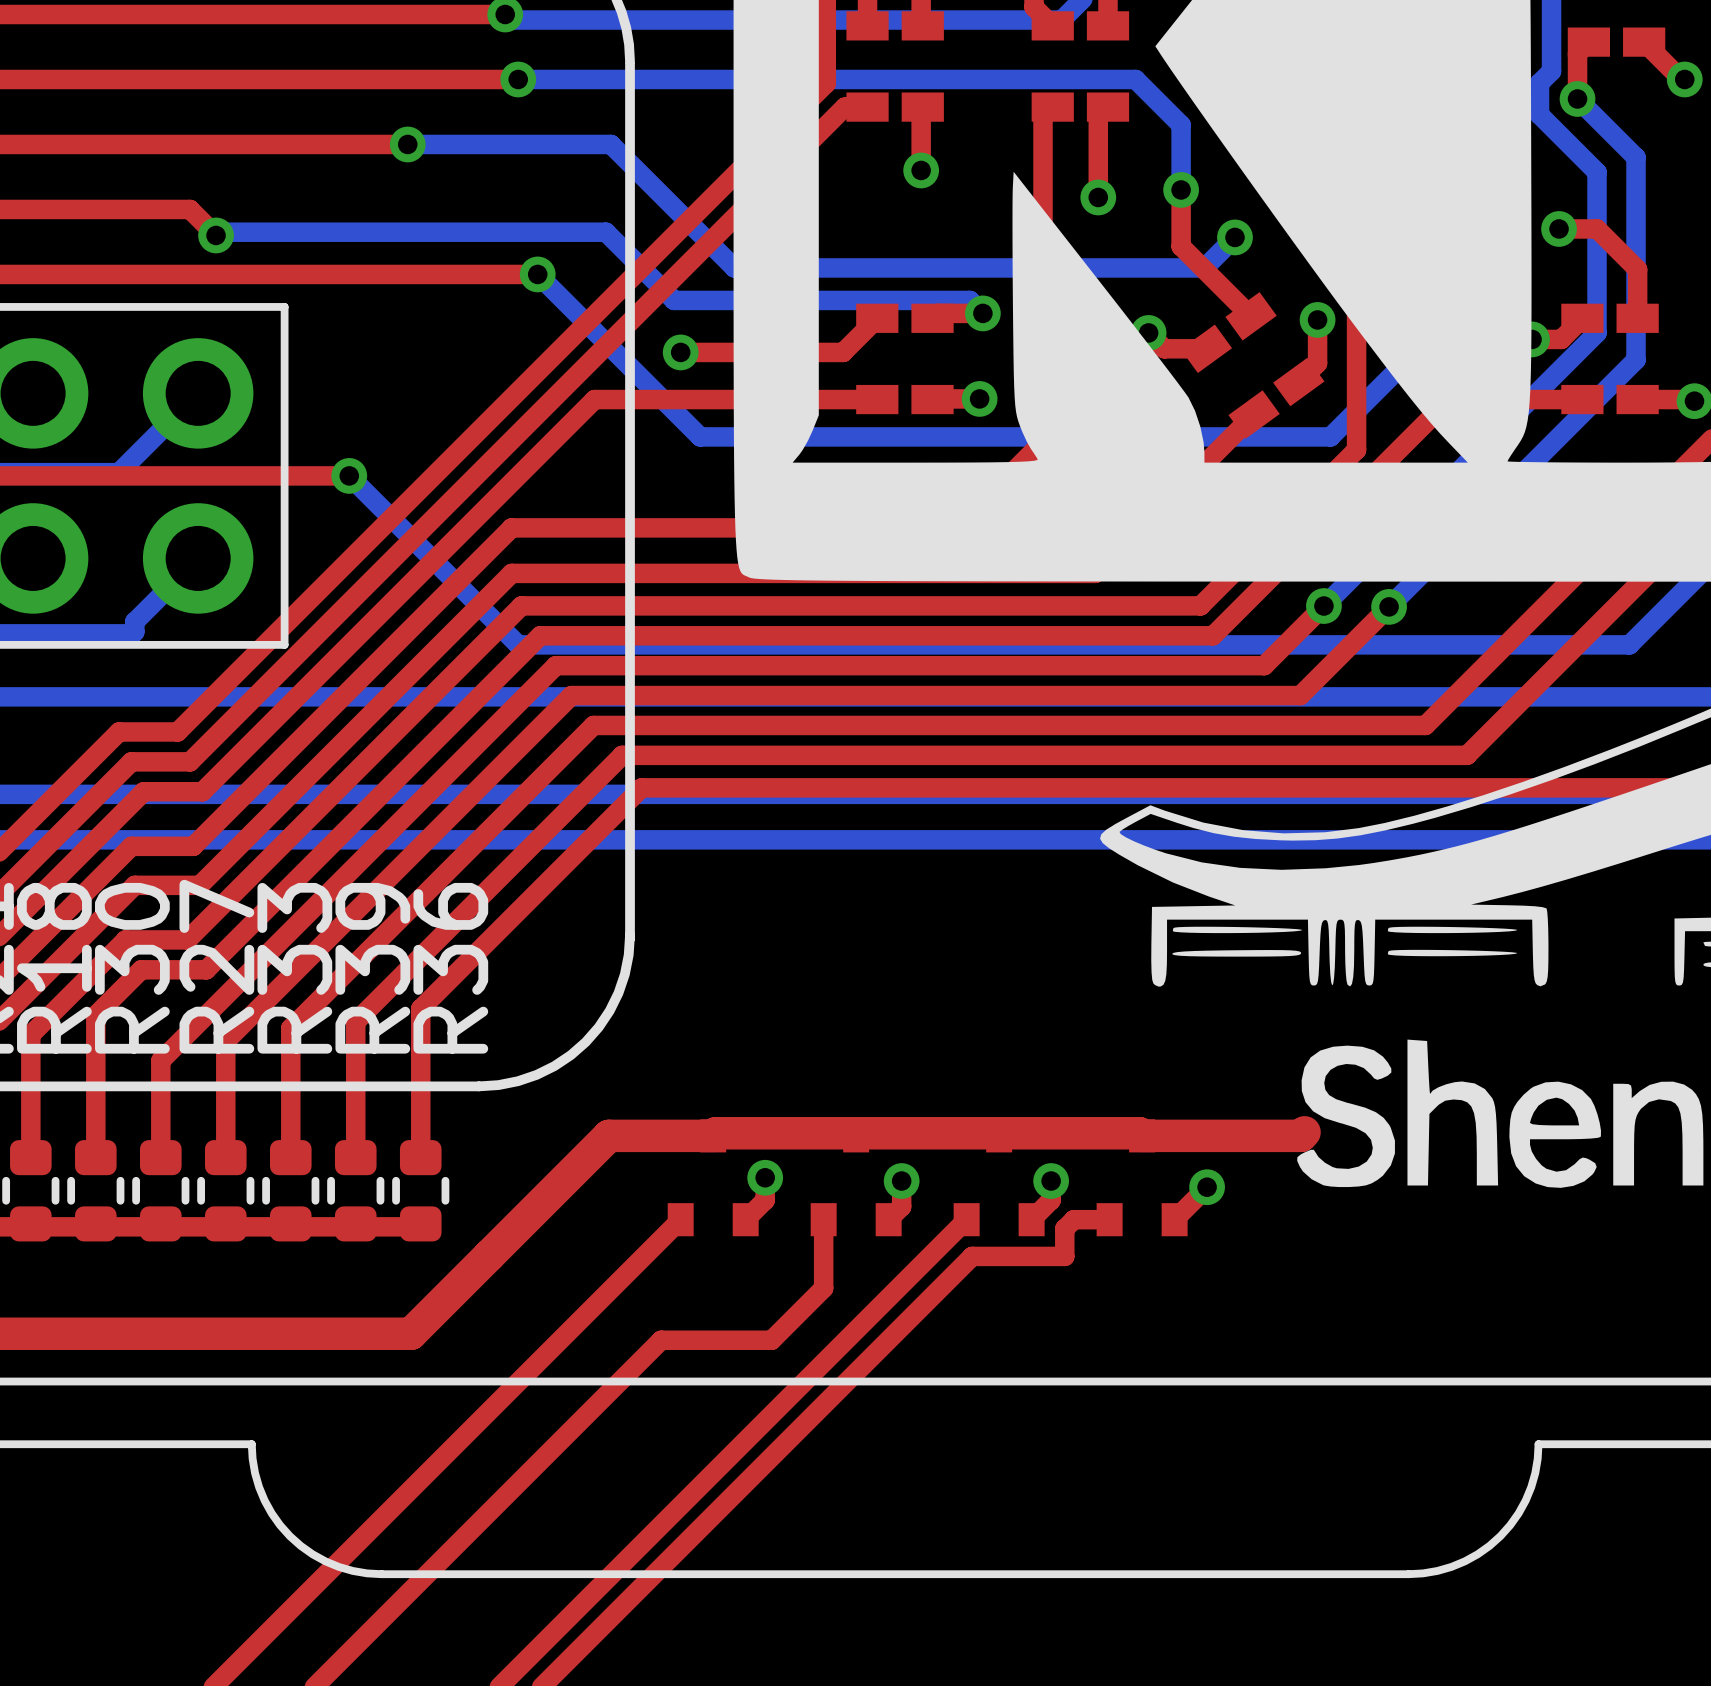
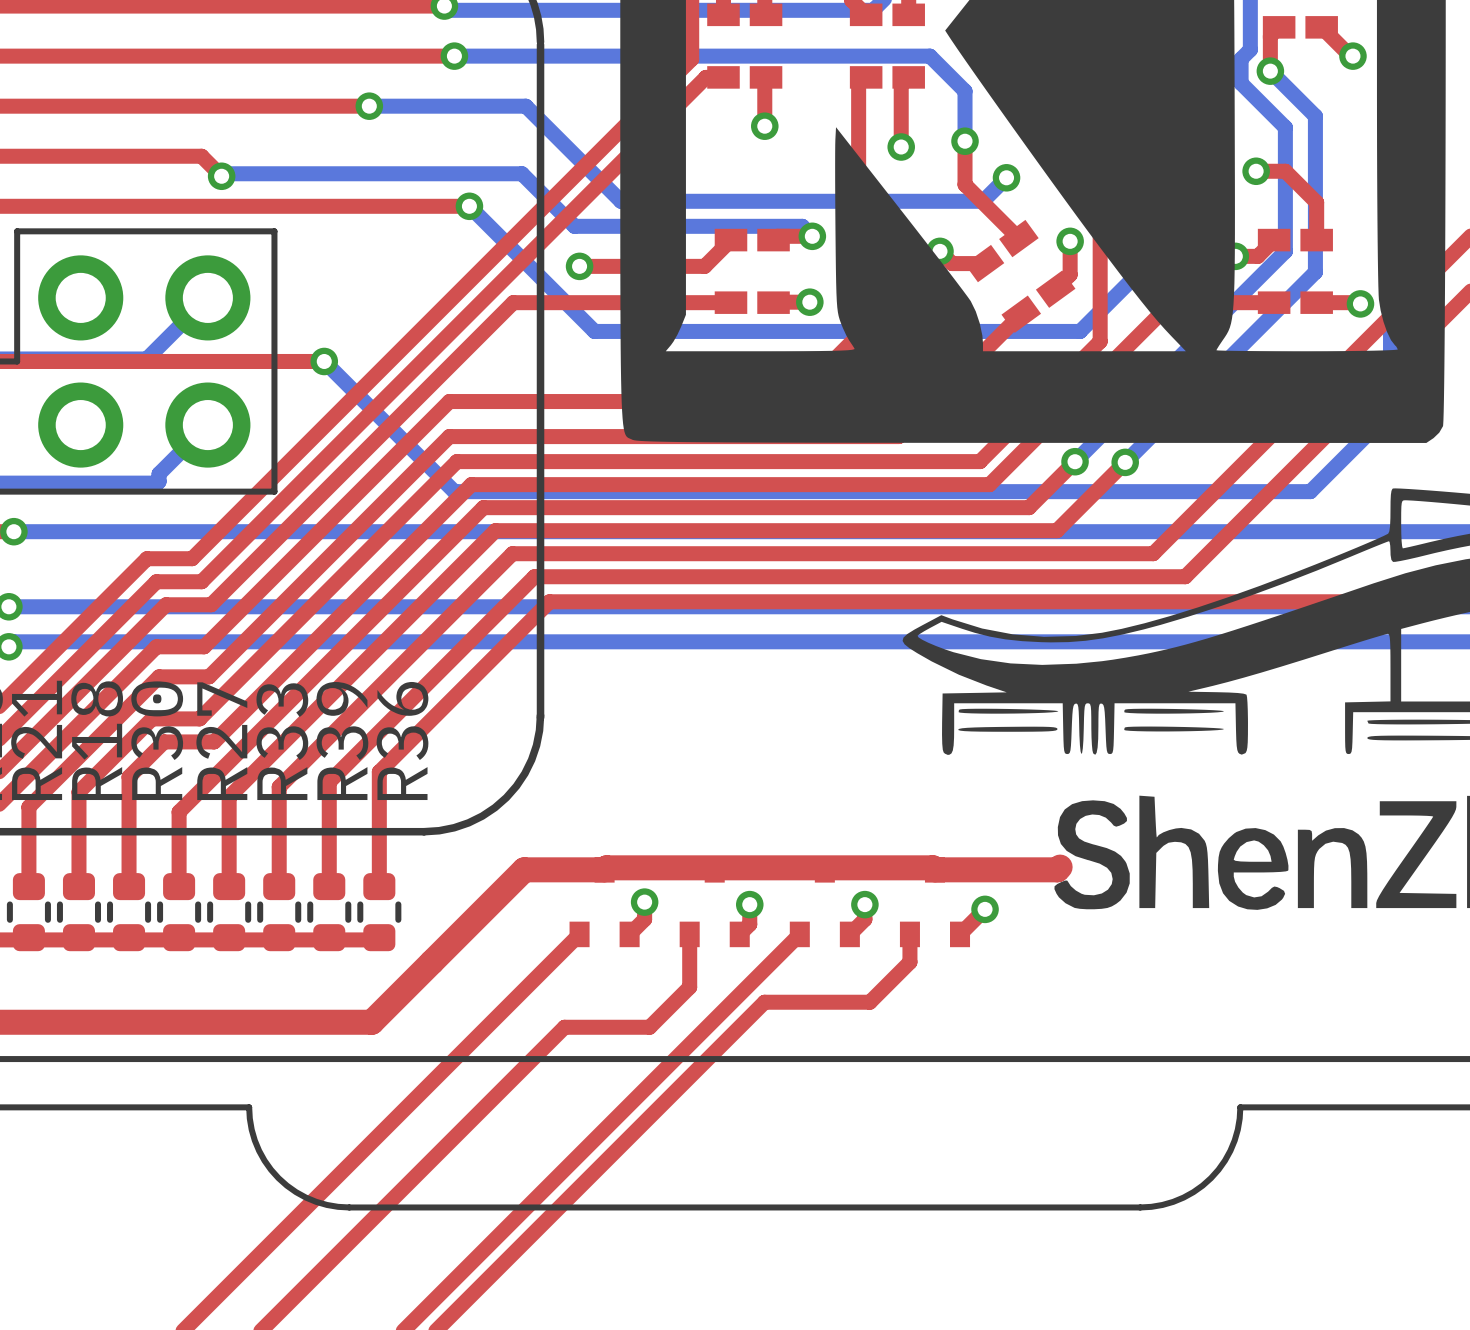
top track: (1109, 1219) (1073, 1219) (1064, 1228) (1064, 1256) (972, 1256) (920, 1307) -> (909, 934) (909, 962) (869, 1002) (764, 1002)

